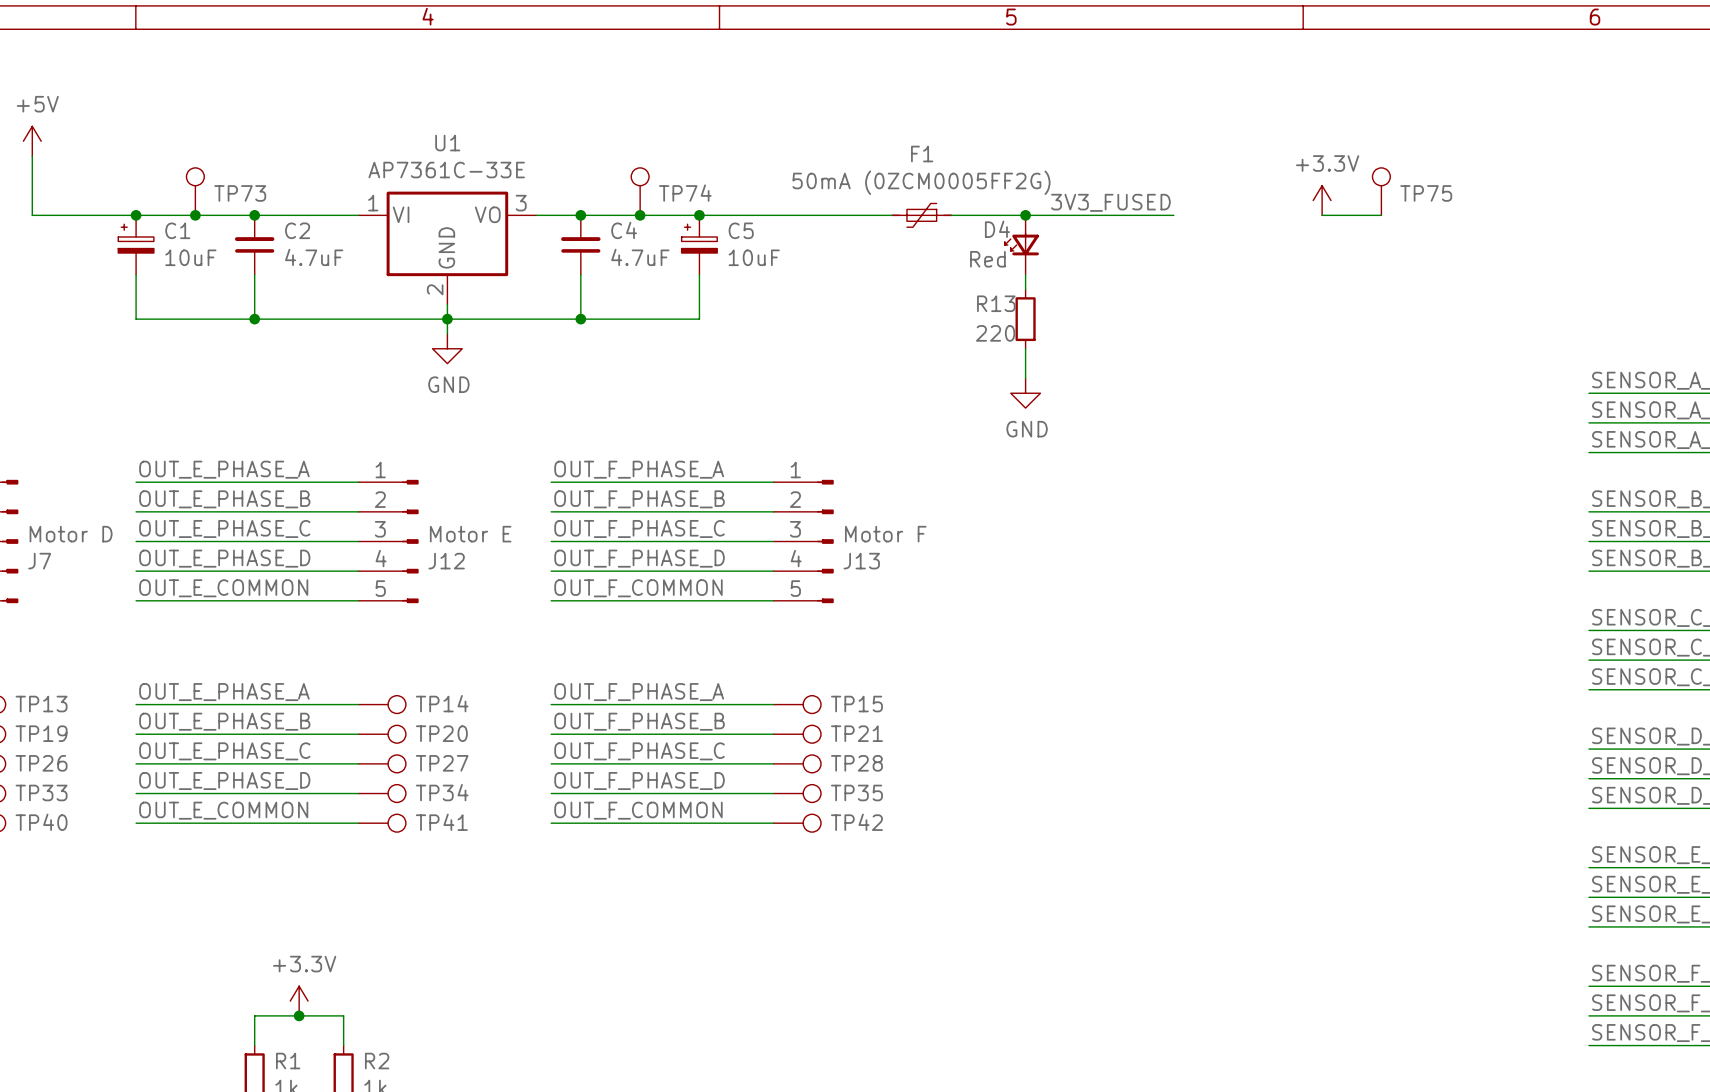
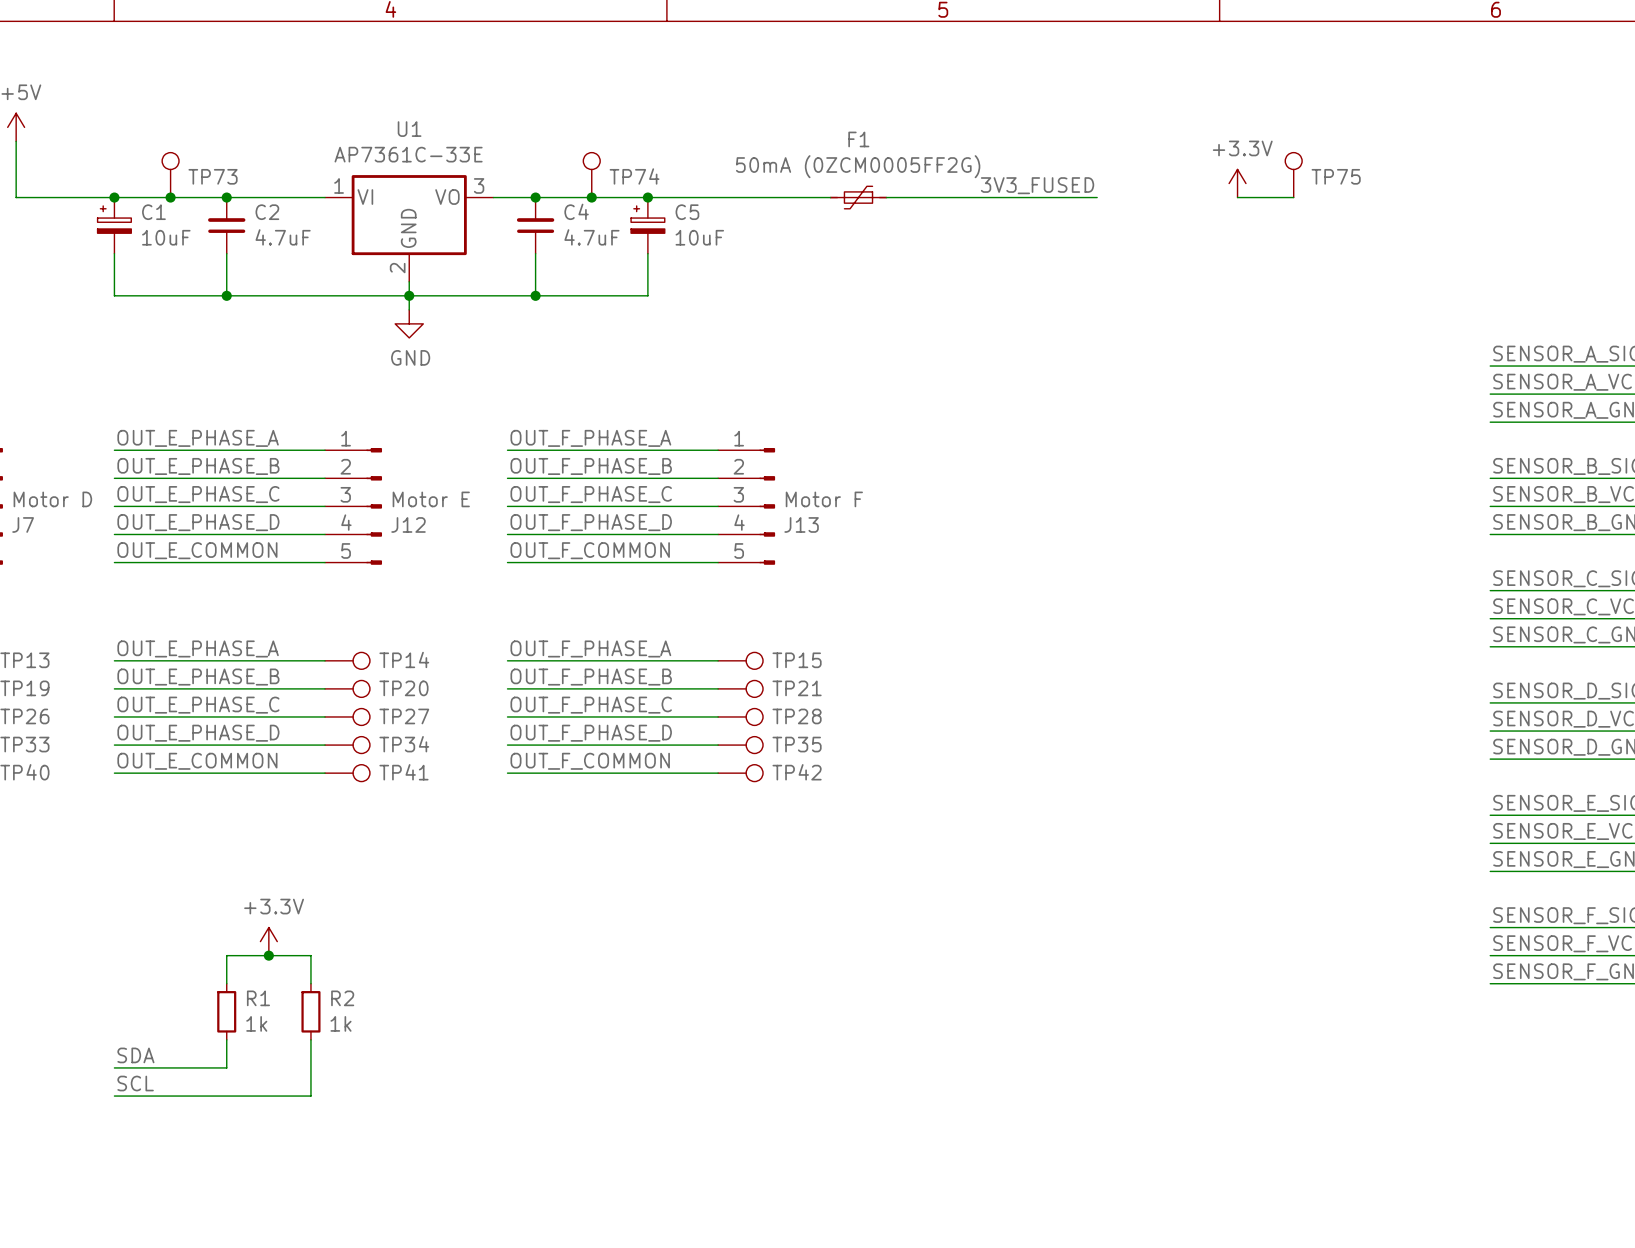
junction: (1025, 215) -> none
D4: Red (1021, 245) -> none
wire: (1025, 274) (1025, 289) -> none
R13: 220 (1025, 319) -> none
wire: (1025, 348) (1025, 378) -> none
power symbol: GND (1025, 393) -> none

